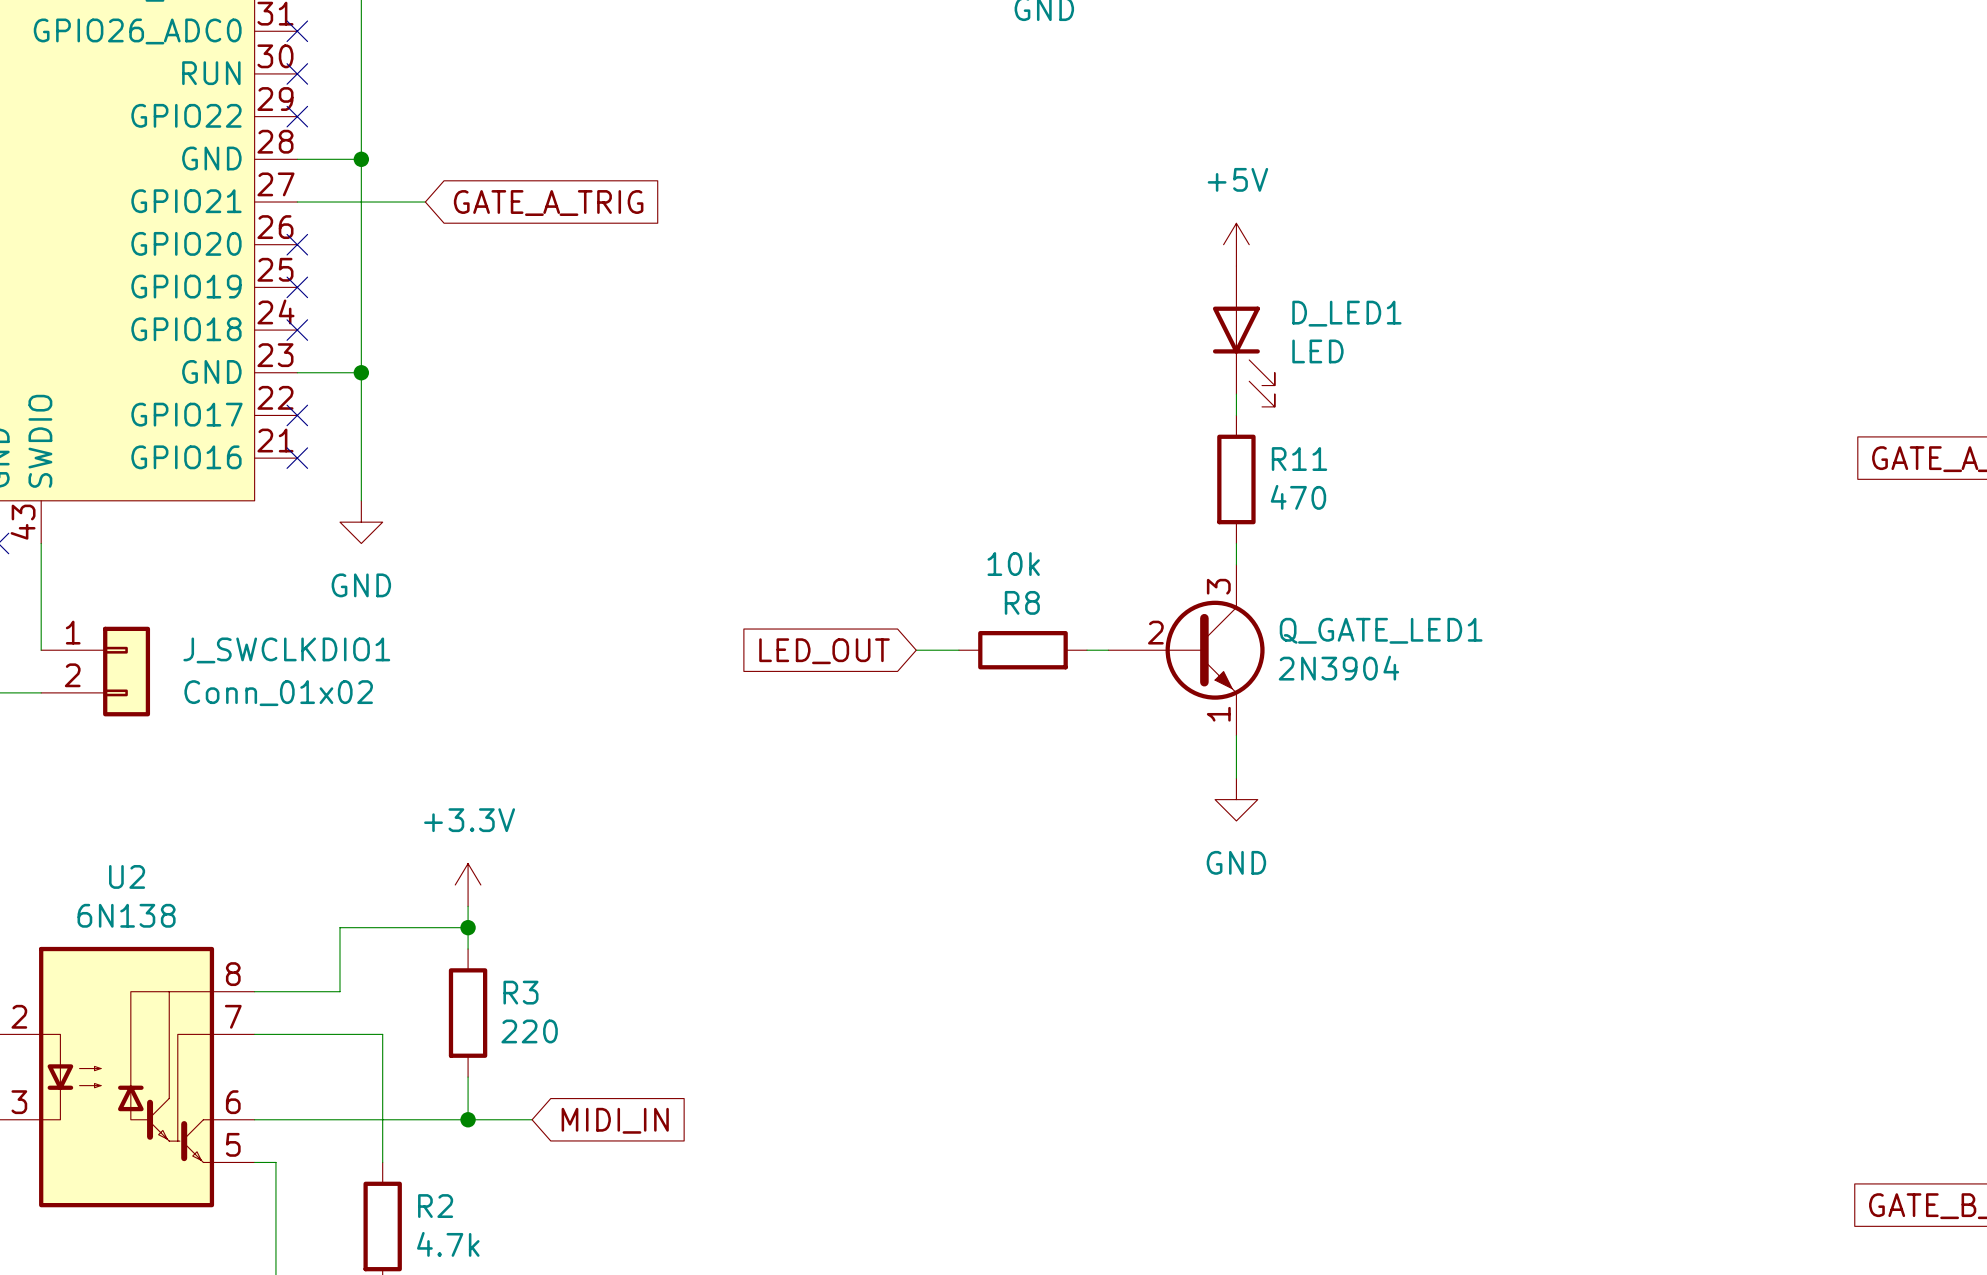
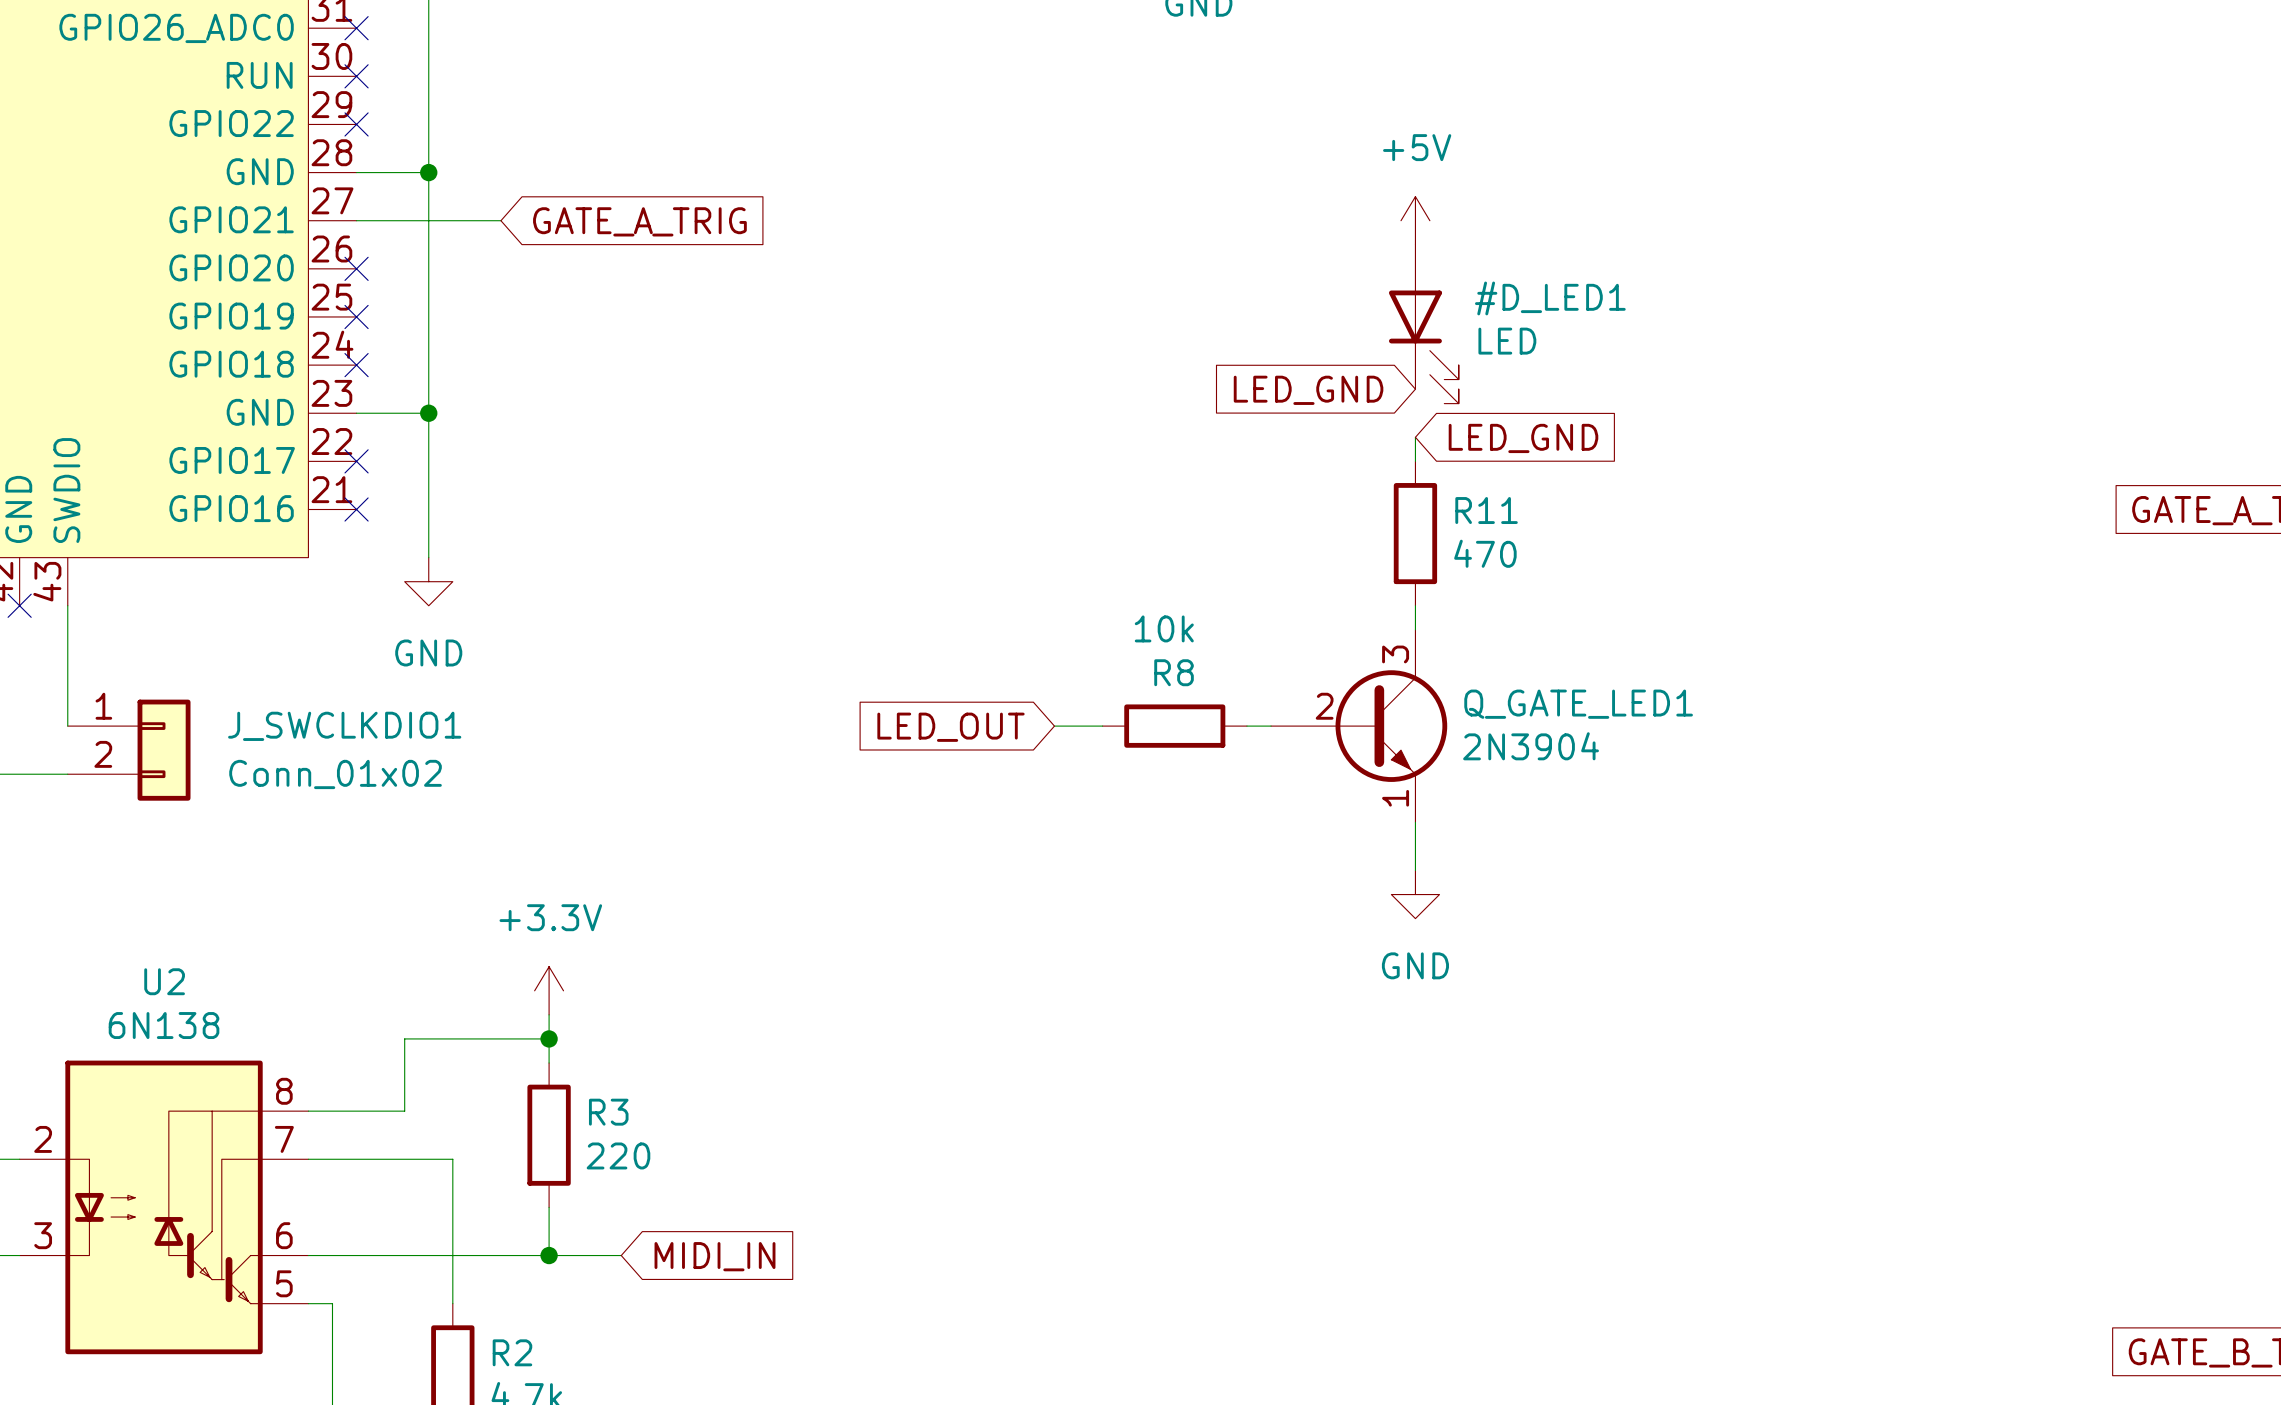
power symbol position: +5V (1236, 244) -> +5V (1415, 220)
#D_LED1: none -> LED (1423, 324)
D_LED1: LED (1243, 336) -> none
global label: none -> LED_GND (1308, 390)
global label: none -> LED_GND (1523, 438)

